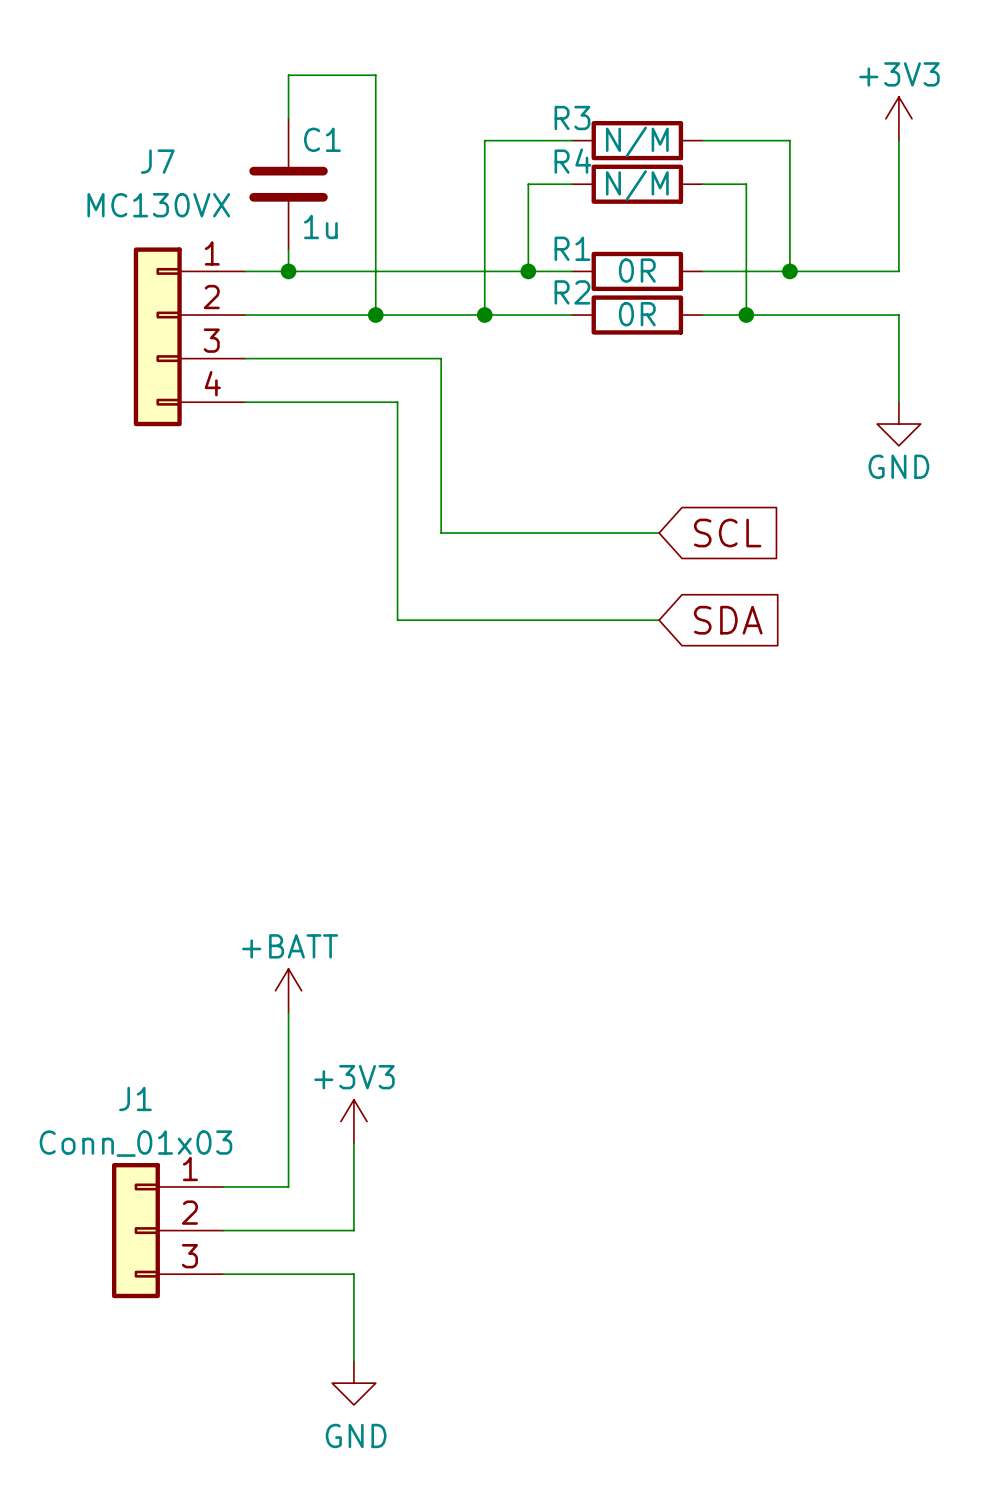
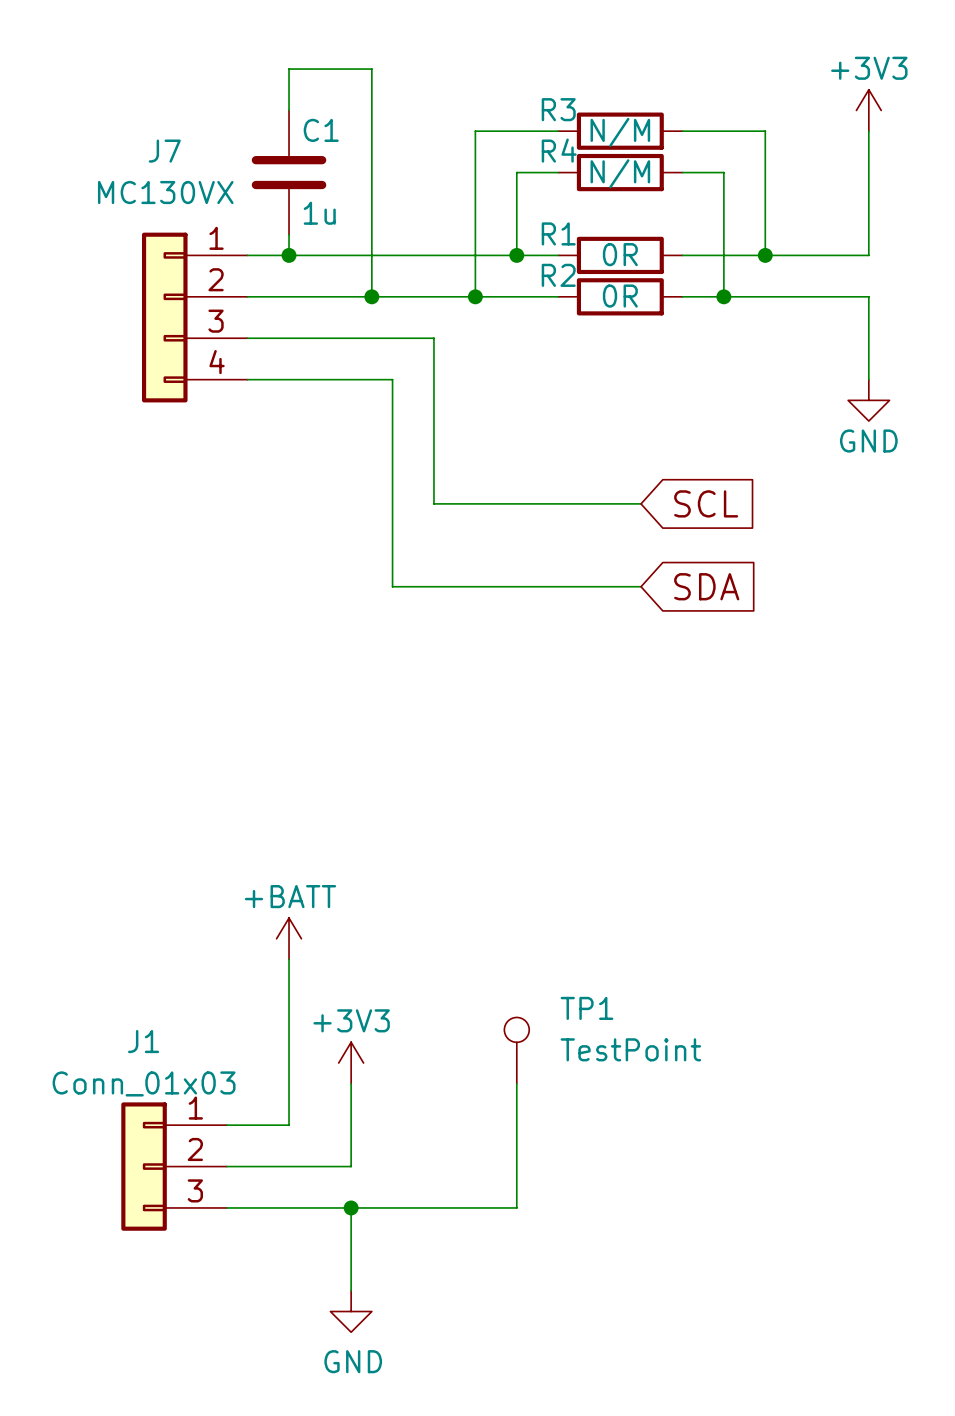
TP1: none -> TestPoint (516, 1050)
wire: none -> (516, 1083) (516, 1207) (351, 1207)
junction: none -> (351, 1207)

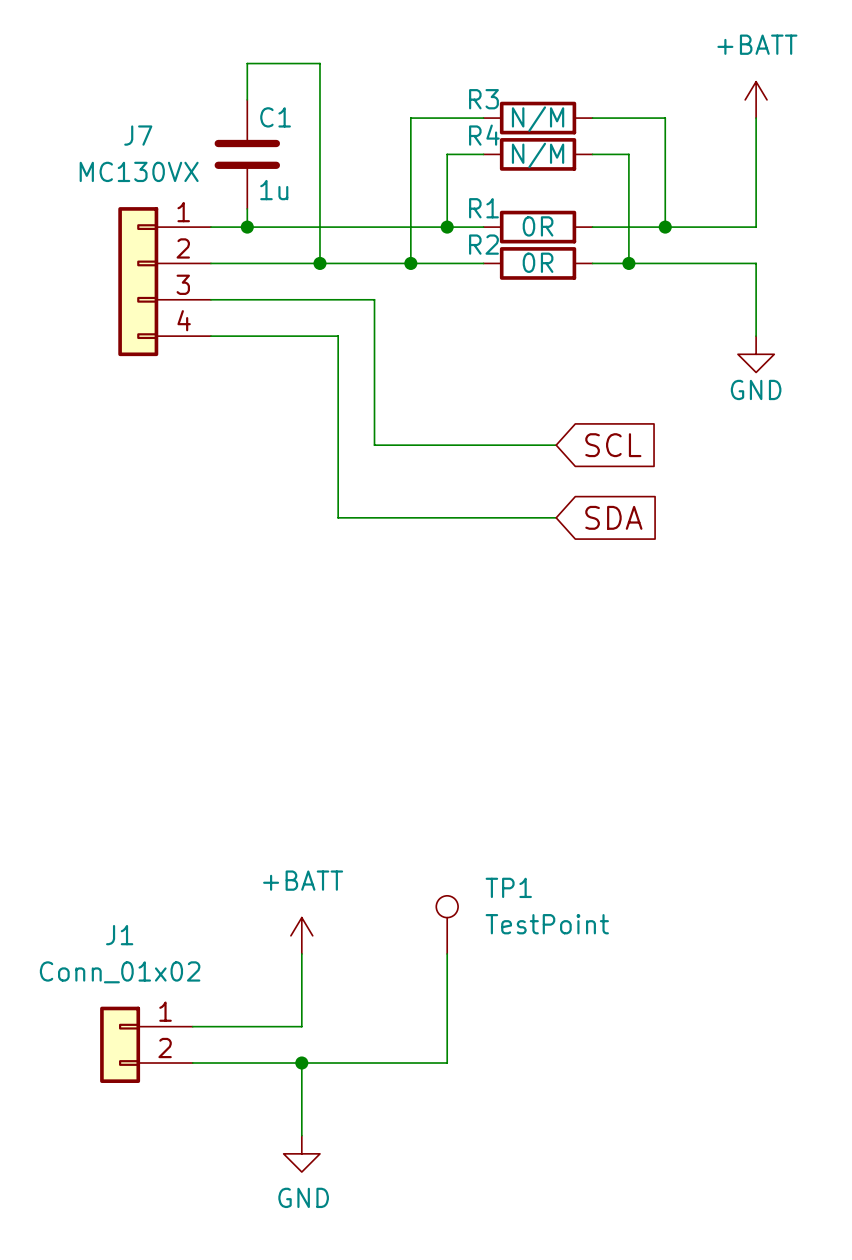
power symbol: +3V3 (868, 110) -> +BATT (756, 99)
power symbol: +BATT (289, 938) -> none
wire: (289, 959) (289, 1125) (226, 1125) -> none
power symbol: +3V3 (351, 1063) -> +BATT (301, 935)
J1 value: Conn_01x03 (144, 1083) -> Conn_01x02 (120, 972)
J1 symbol: [121, 1102, 227, 1231] -> [100, 1006, 193, 1083]

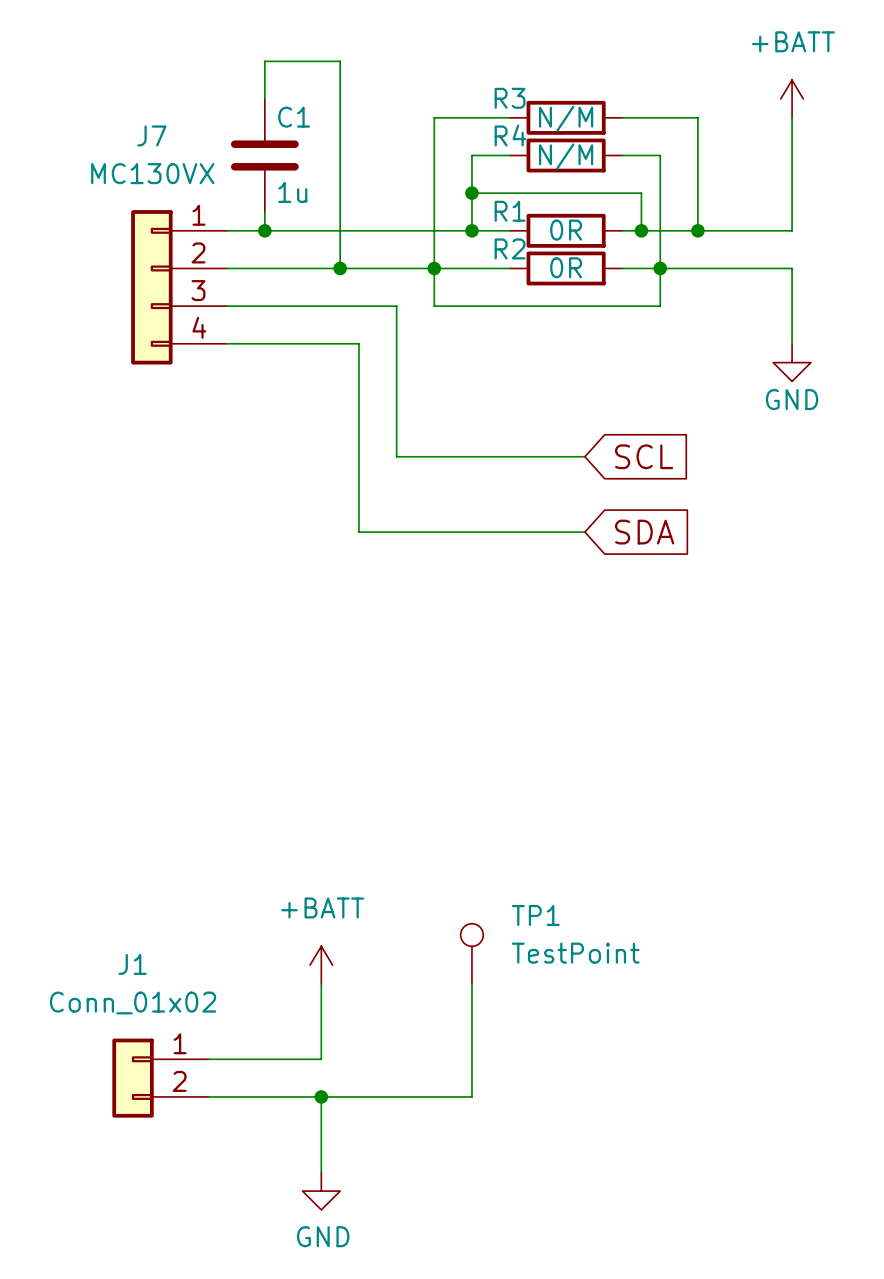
wire: none -> (471, 193) (641, 193) (641, 230)
junction: none -> (471, 193)
junction: none -> (641, 230)
wire: none -> (434, 268) (434, 306) (660, 306) (660, 268)

